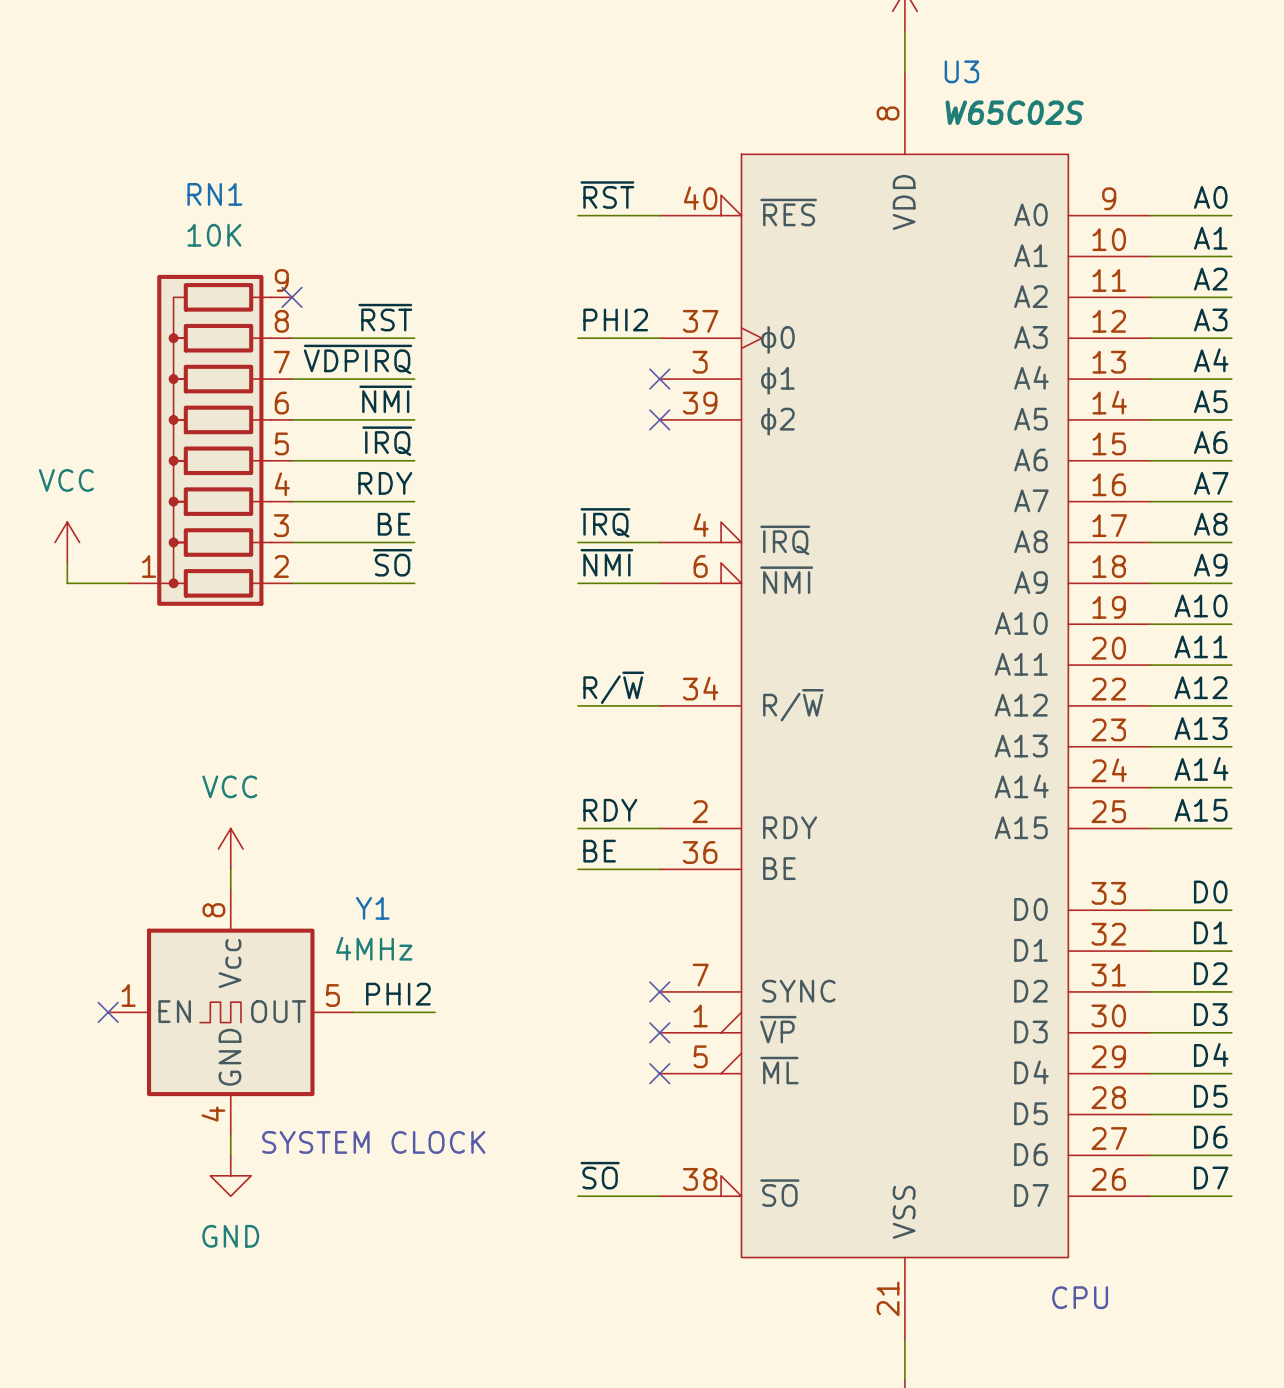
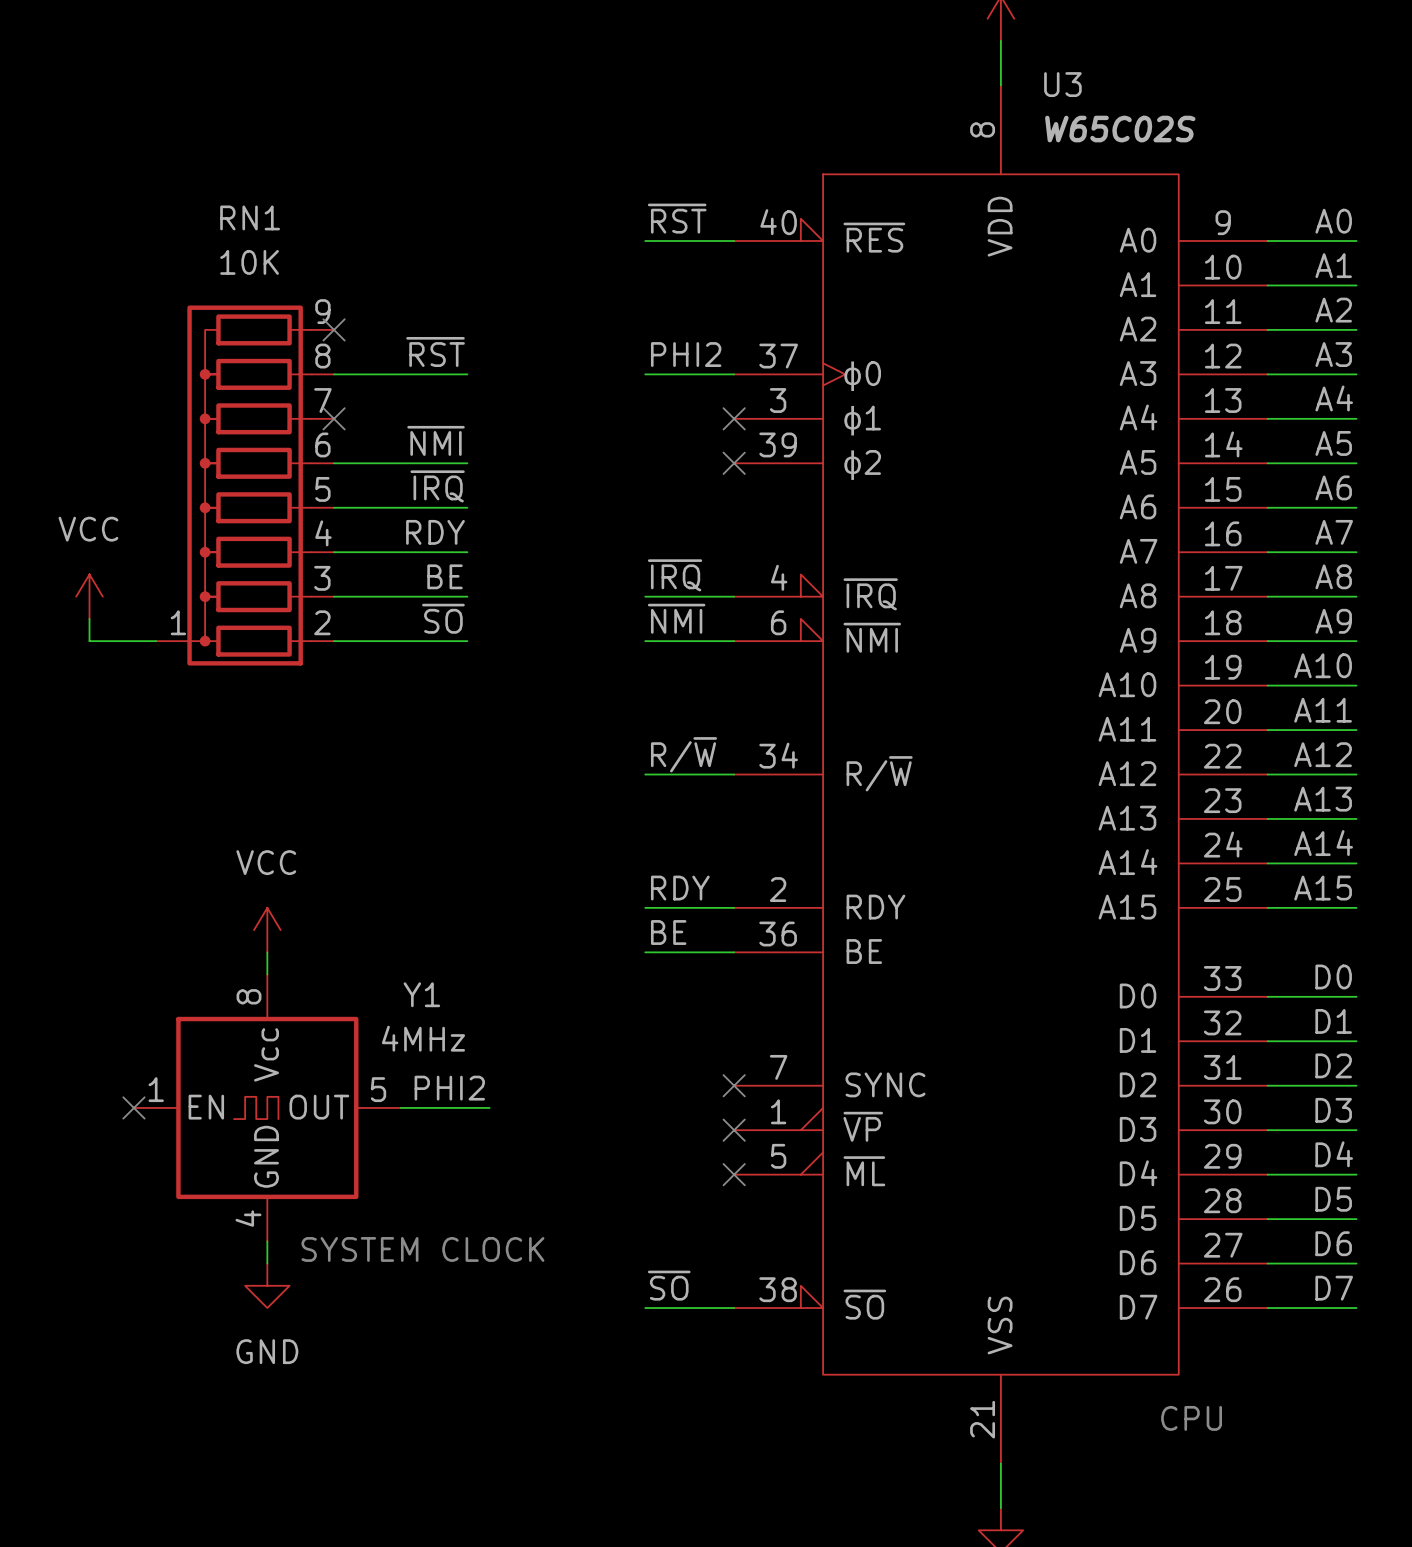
label: ~{VDPIRQ} (357, 359) -> none
wire: (292, 379) (414, 379) -> none
no-connect mark: none -> (334, 418)

